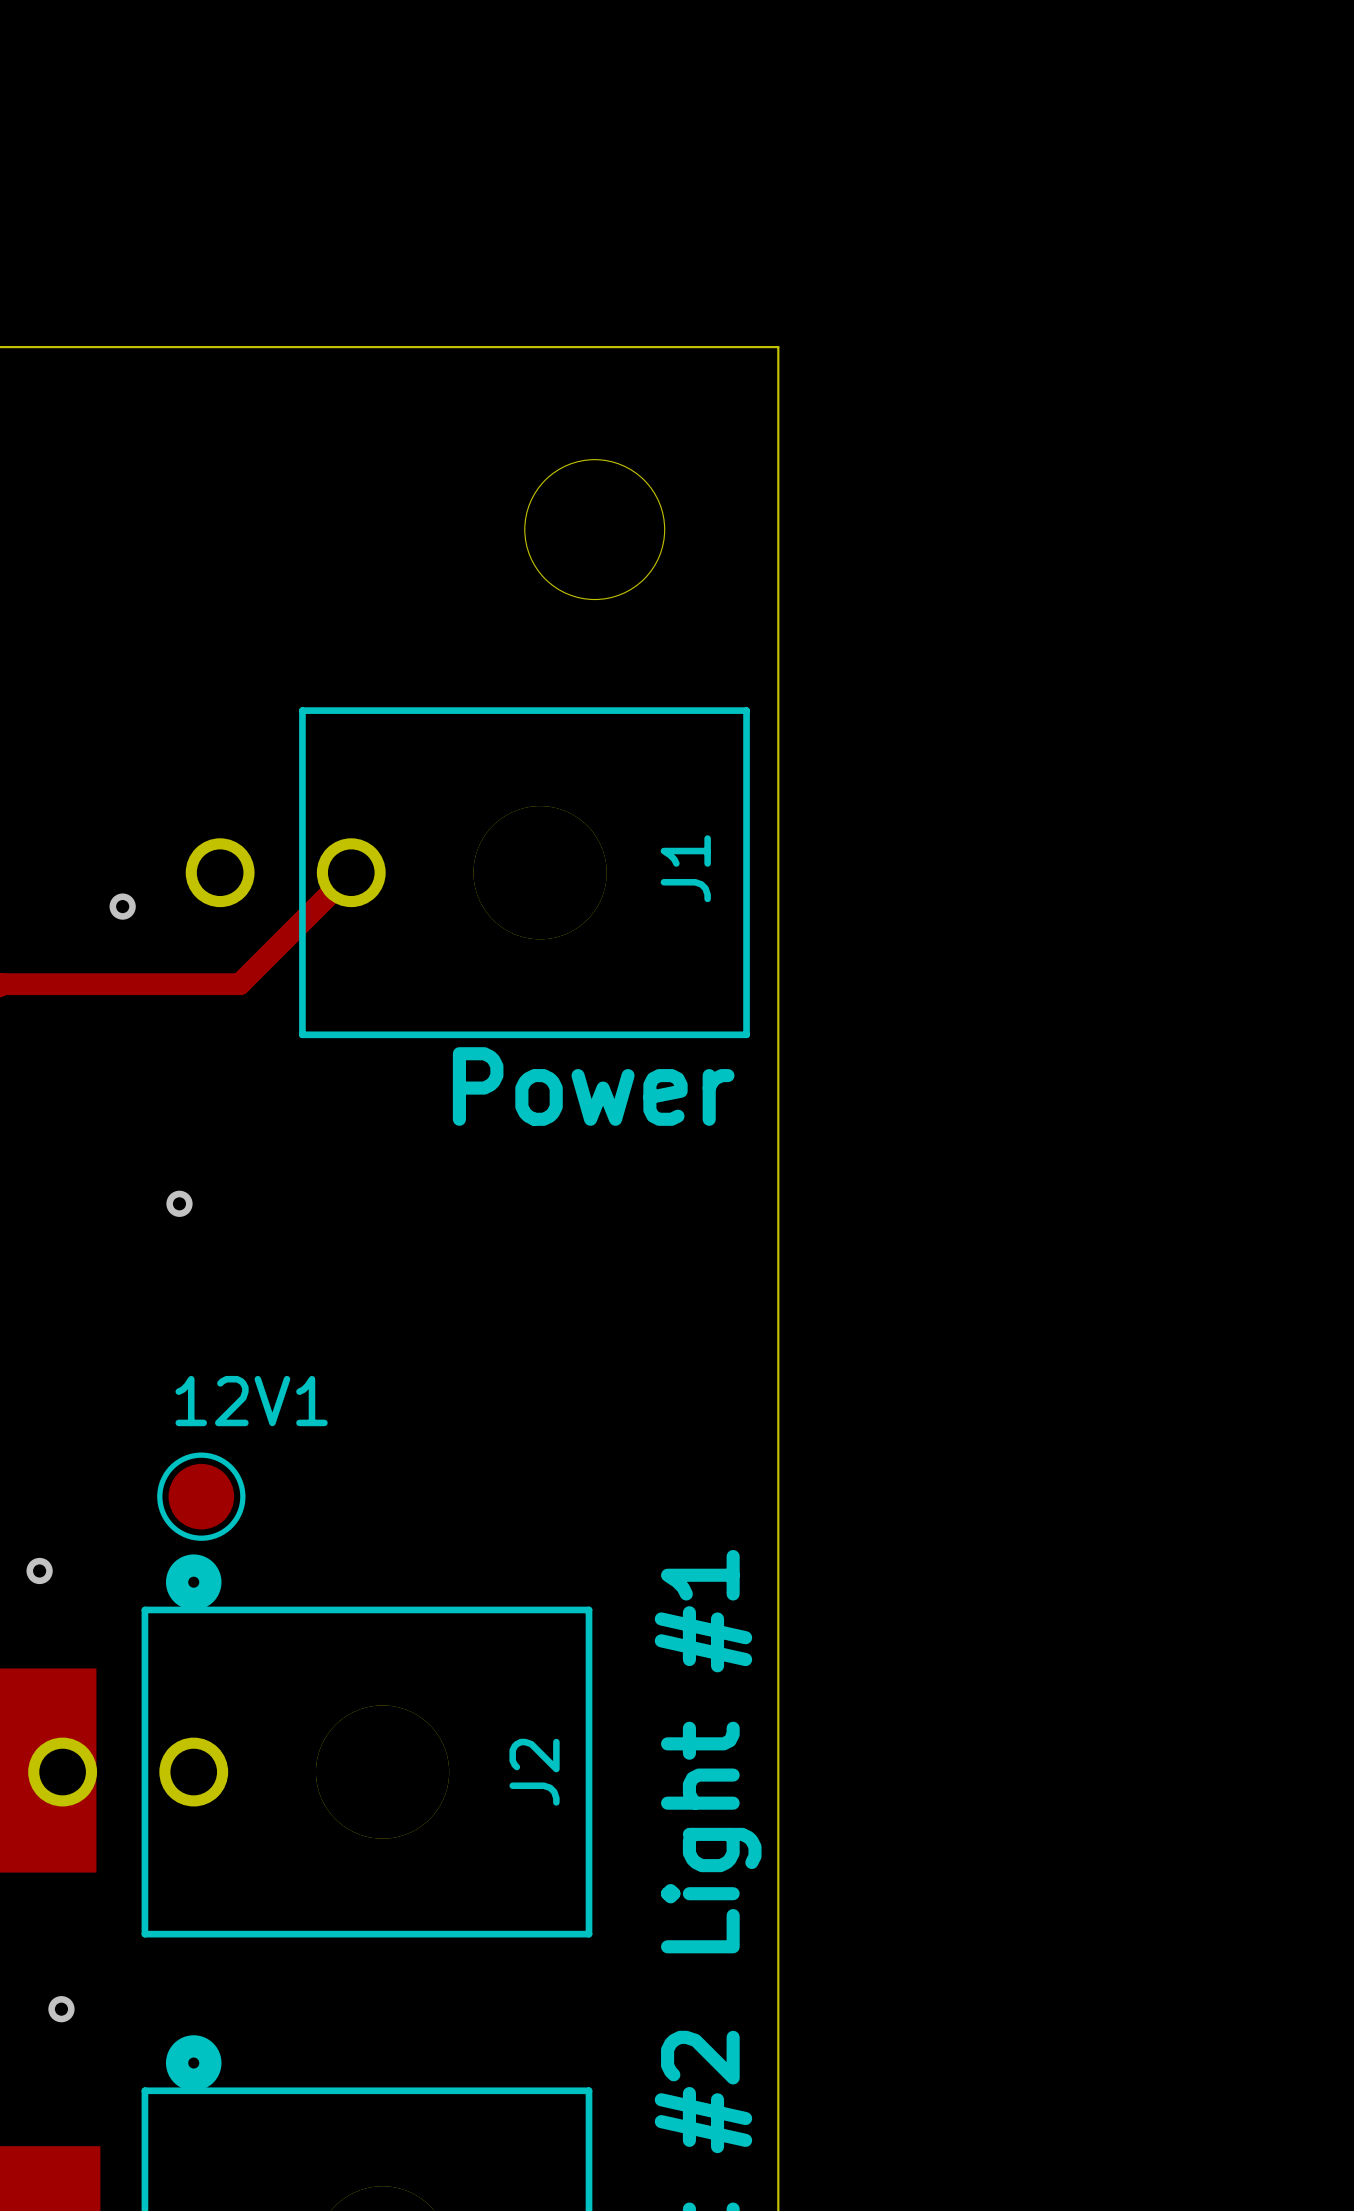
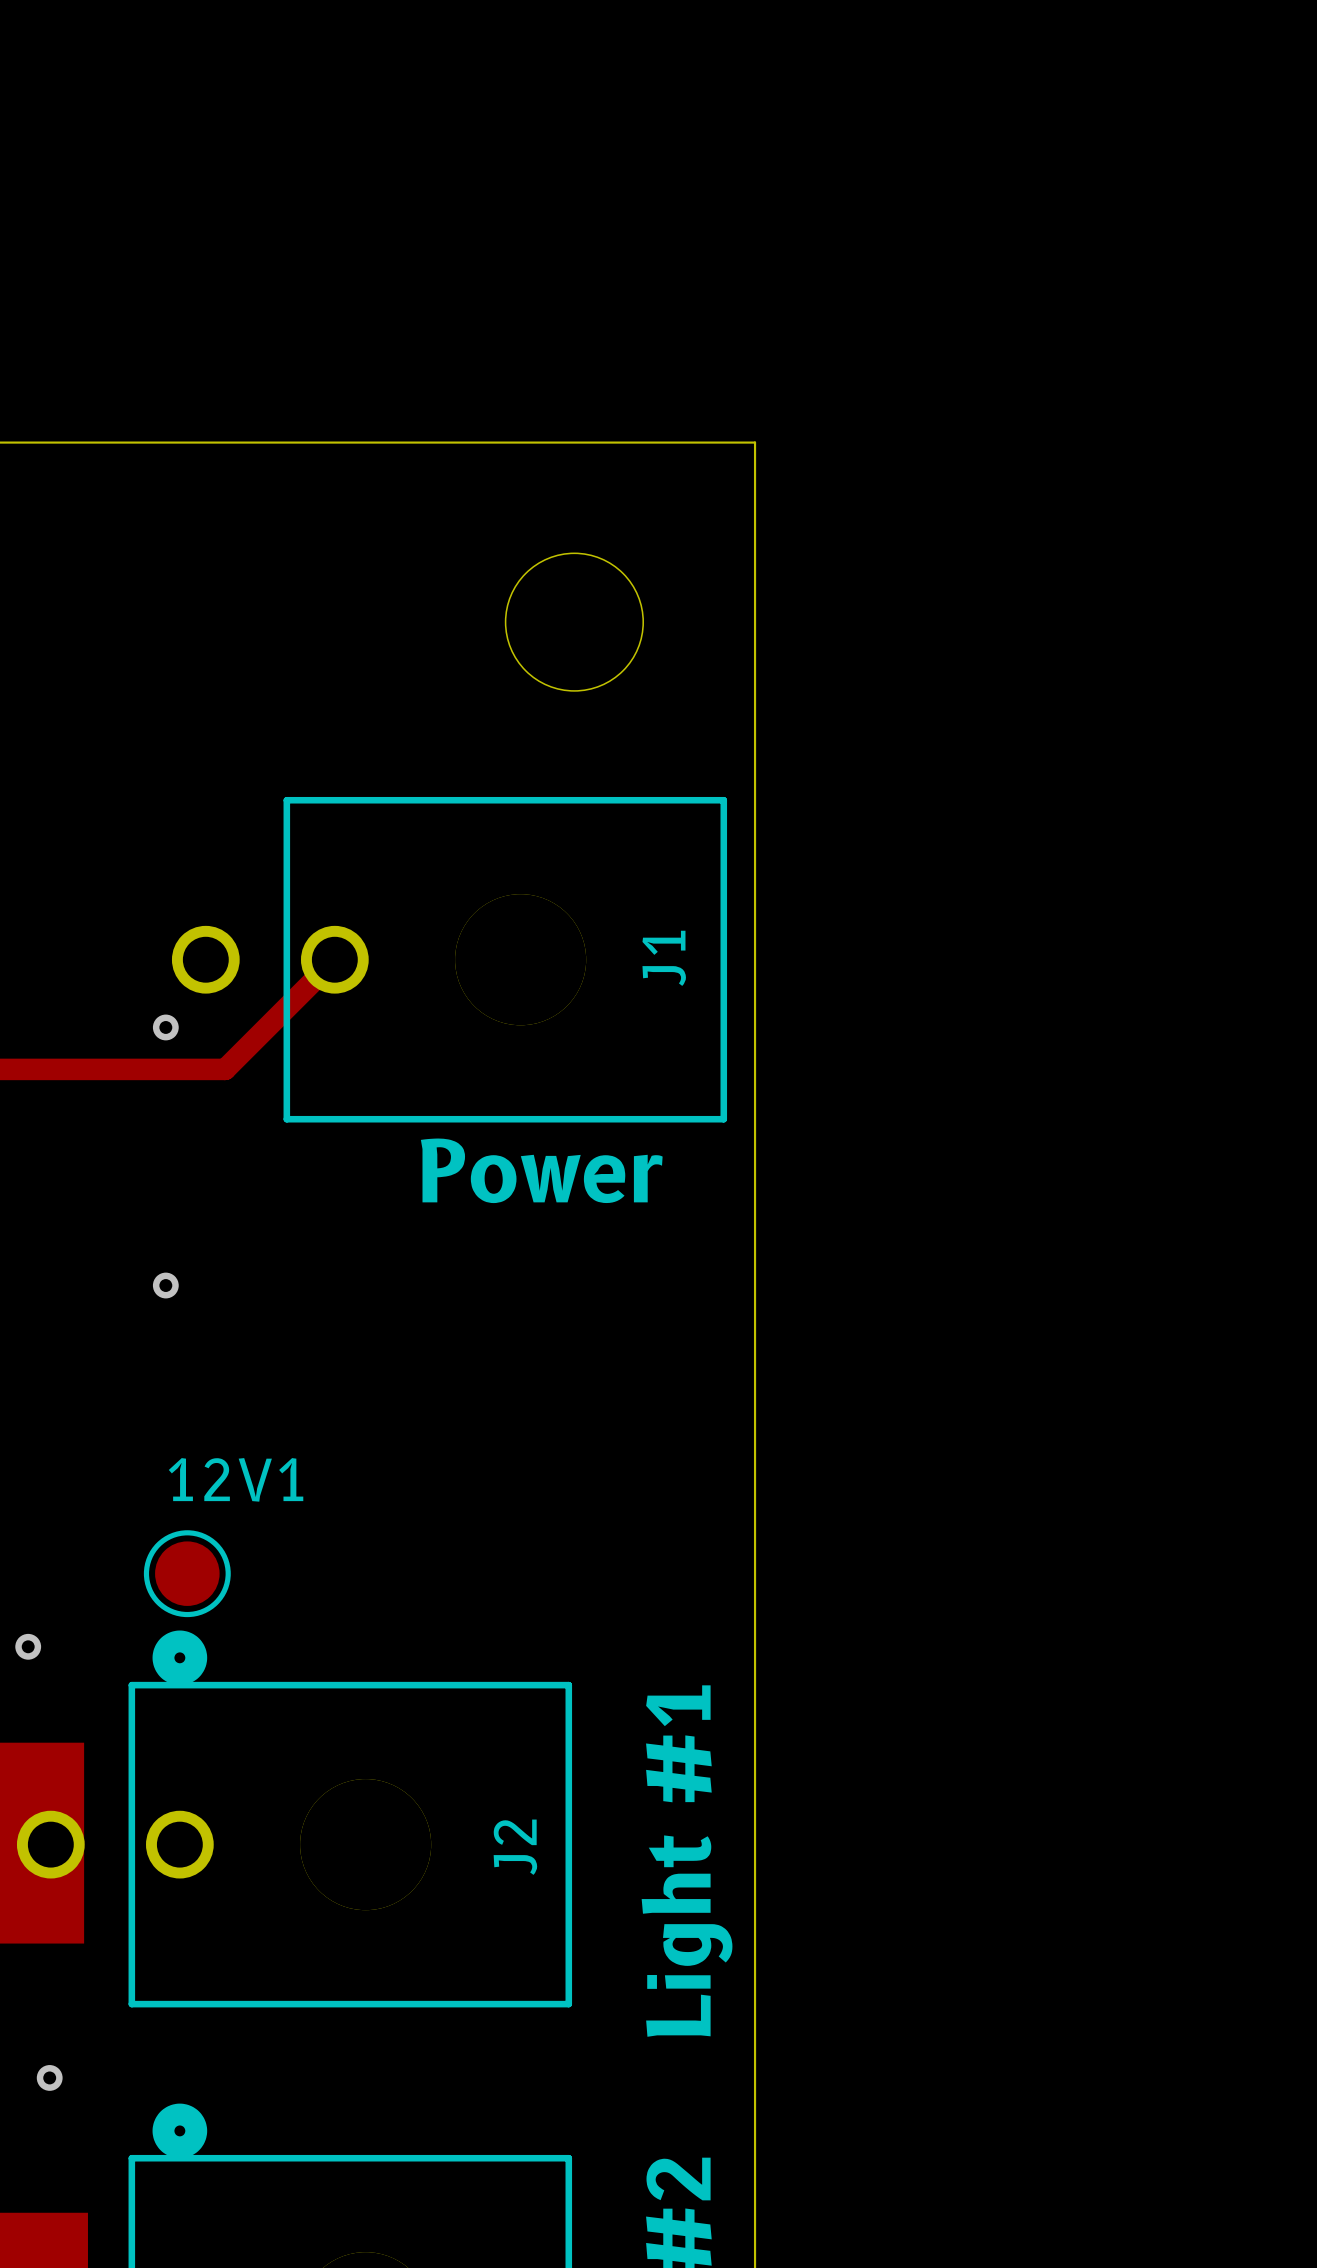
via position: (122, 906) -> (165, 1027)

